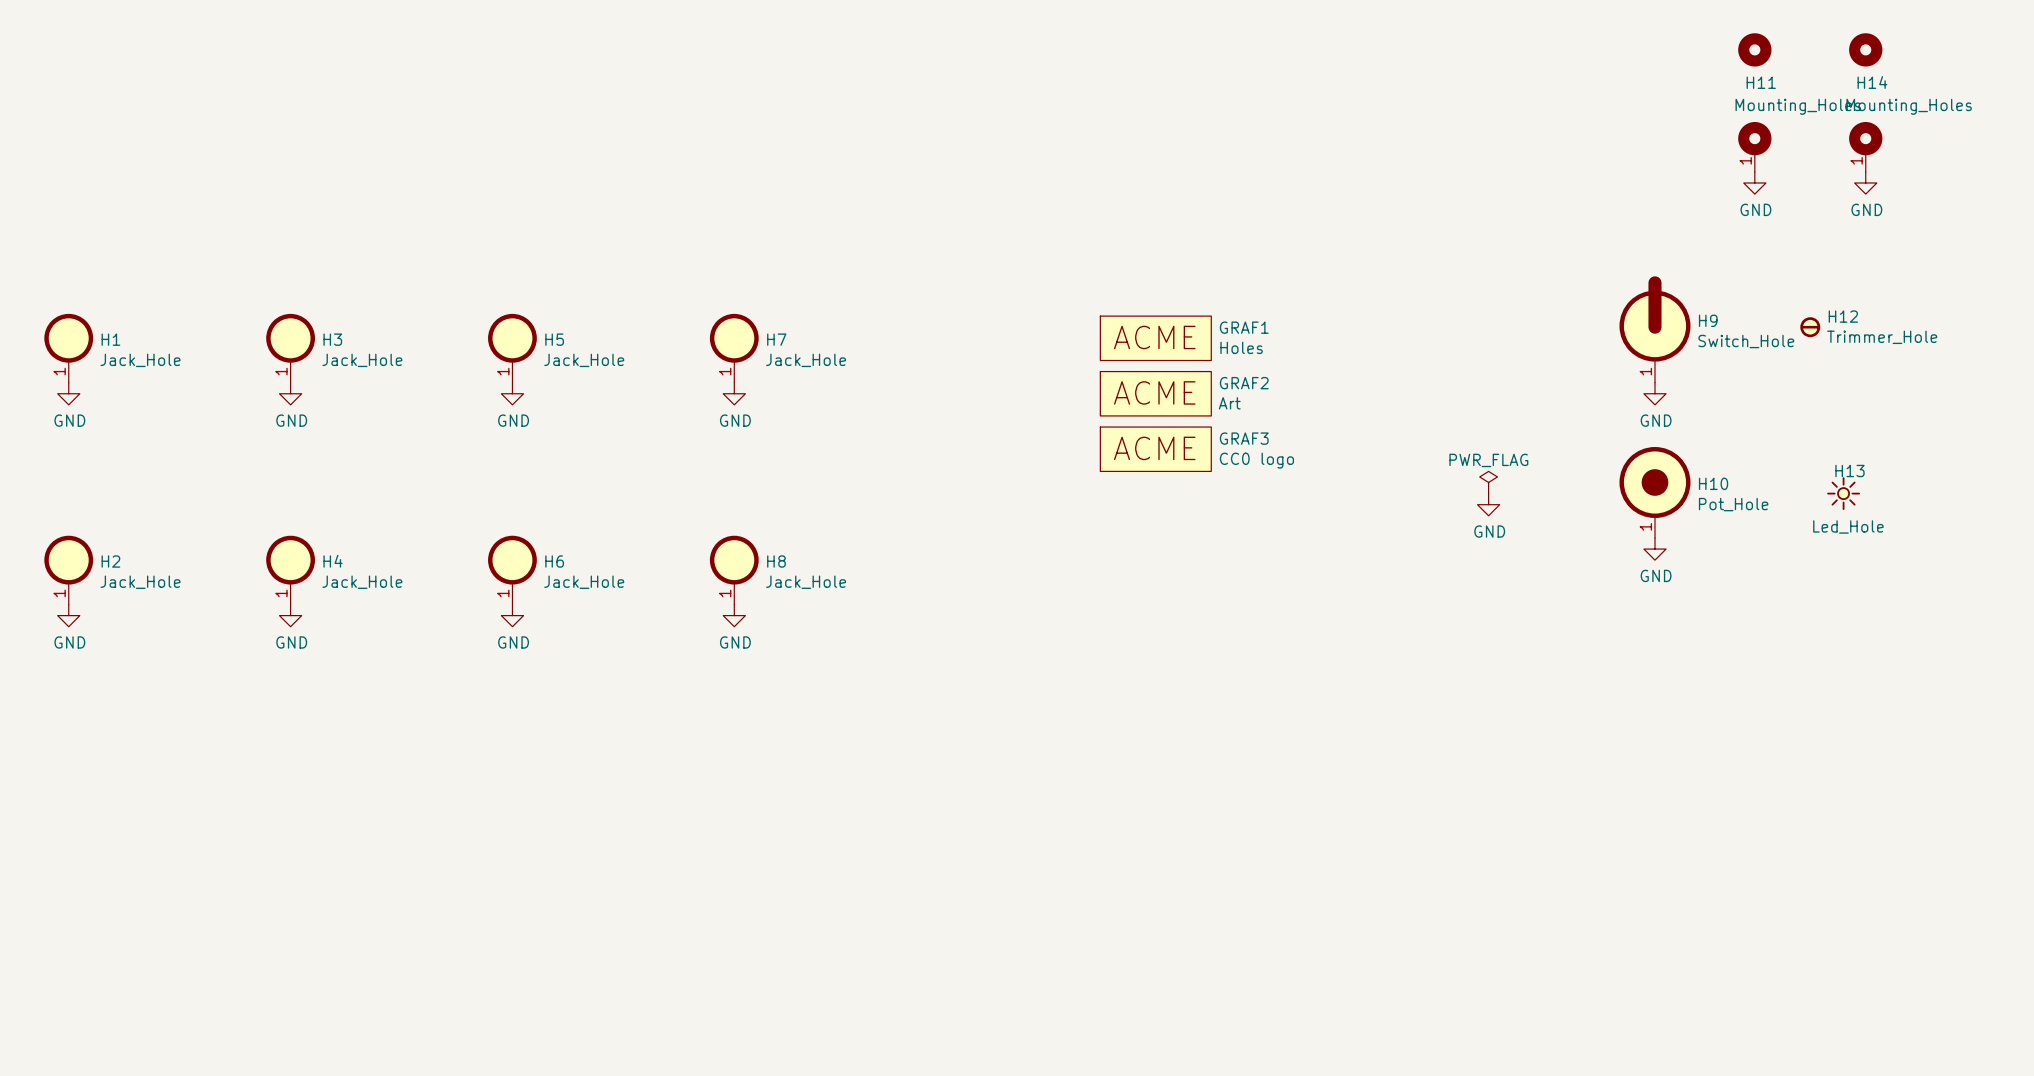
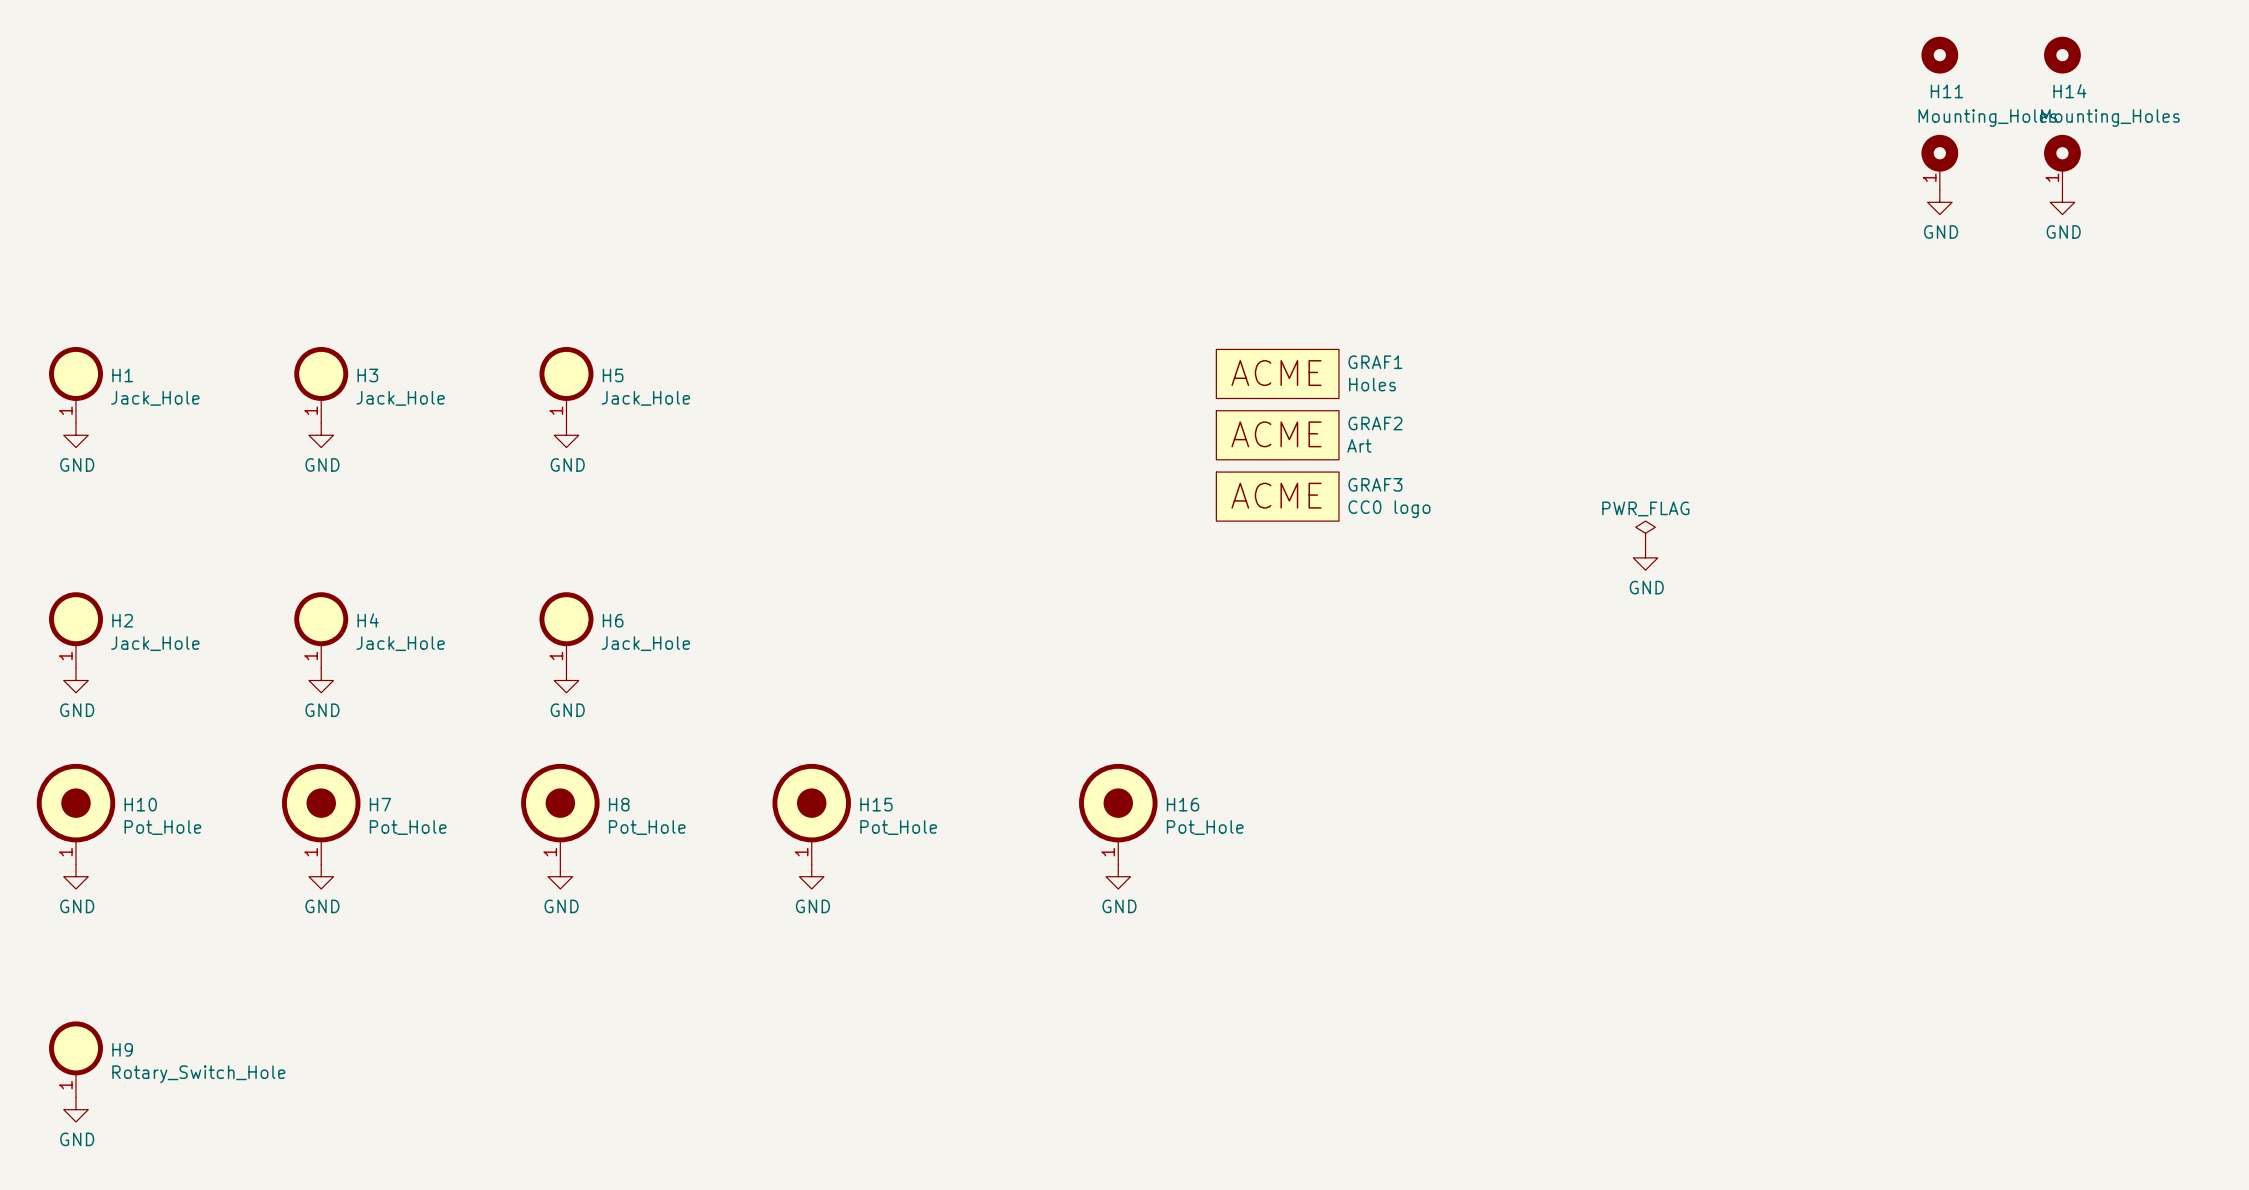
H9 symbol: [1619, 276, 1691, 383] -> [49, 1021, 103, 1098]
H7 symbol: [709, 313, 759, 383] -> [281, 763, 361, 865]
H12: Trimmer_Hole (1810, 327) -> none
H9 value: Switch_Hole (1746, 341) -> Rotary_Switch_Hole (198, 1074)
H7 value: Jack_Hole (806, 360) -> Pot_Hole (408, 827)
power symbol: GND (734, 393) -> none
power symbol: GND (1654, 393) -> none
H10 position: (1654, 492) -> (75, 814)
H13: Led_Hole (1843, 493) -> none
H8 symbol: [709, 535, 759, 605] -> [521, 763, 600, 865]
power symbol: GND (1654, 549) -> none
H8 value: Jack_Hole (806, 582) -> Pot_Hole (647, 827)
power symbol: GND (734, 615) -> none
H15: none -> Pot_Hole (811, 814)
H16: none -> Pot_Hole (1118, 814)
power symbol: none -> GND (75, 876)
power symbol: none -> GND (321, 876)
power symbol: none -> GND (560, 876)
power symbol: none -> GND (811, 876)
power symbol: none -> GND (1118, 876)
power symbol: none -> GND (75, 1109)

